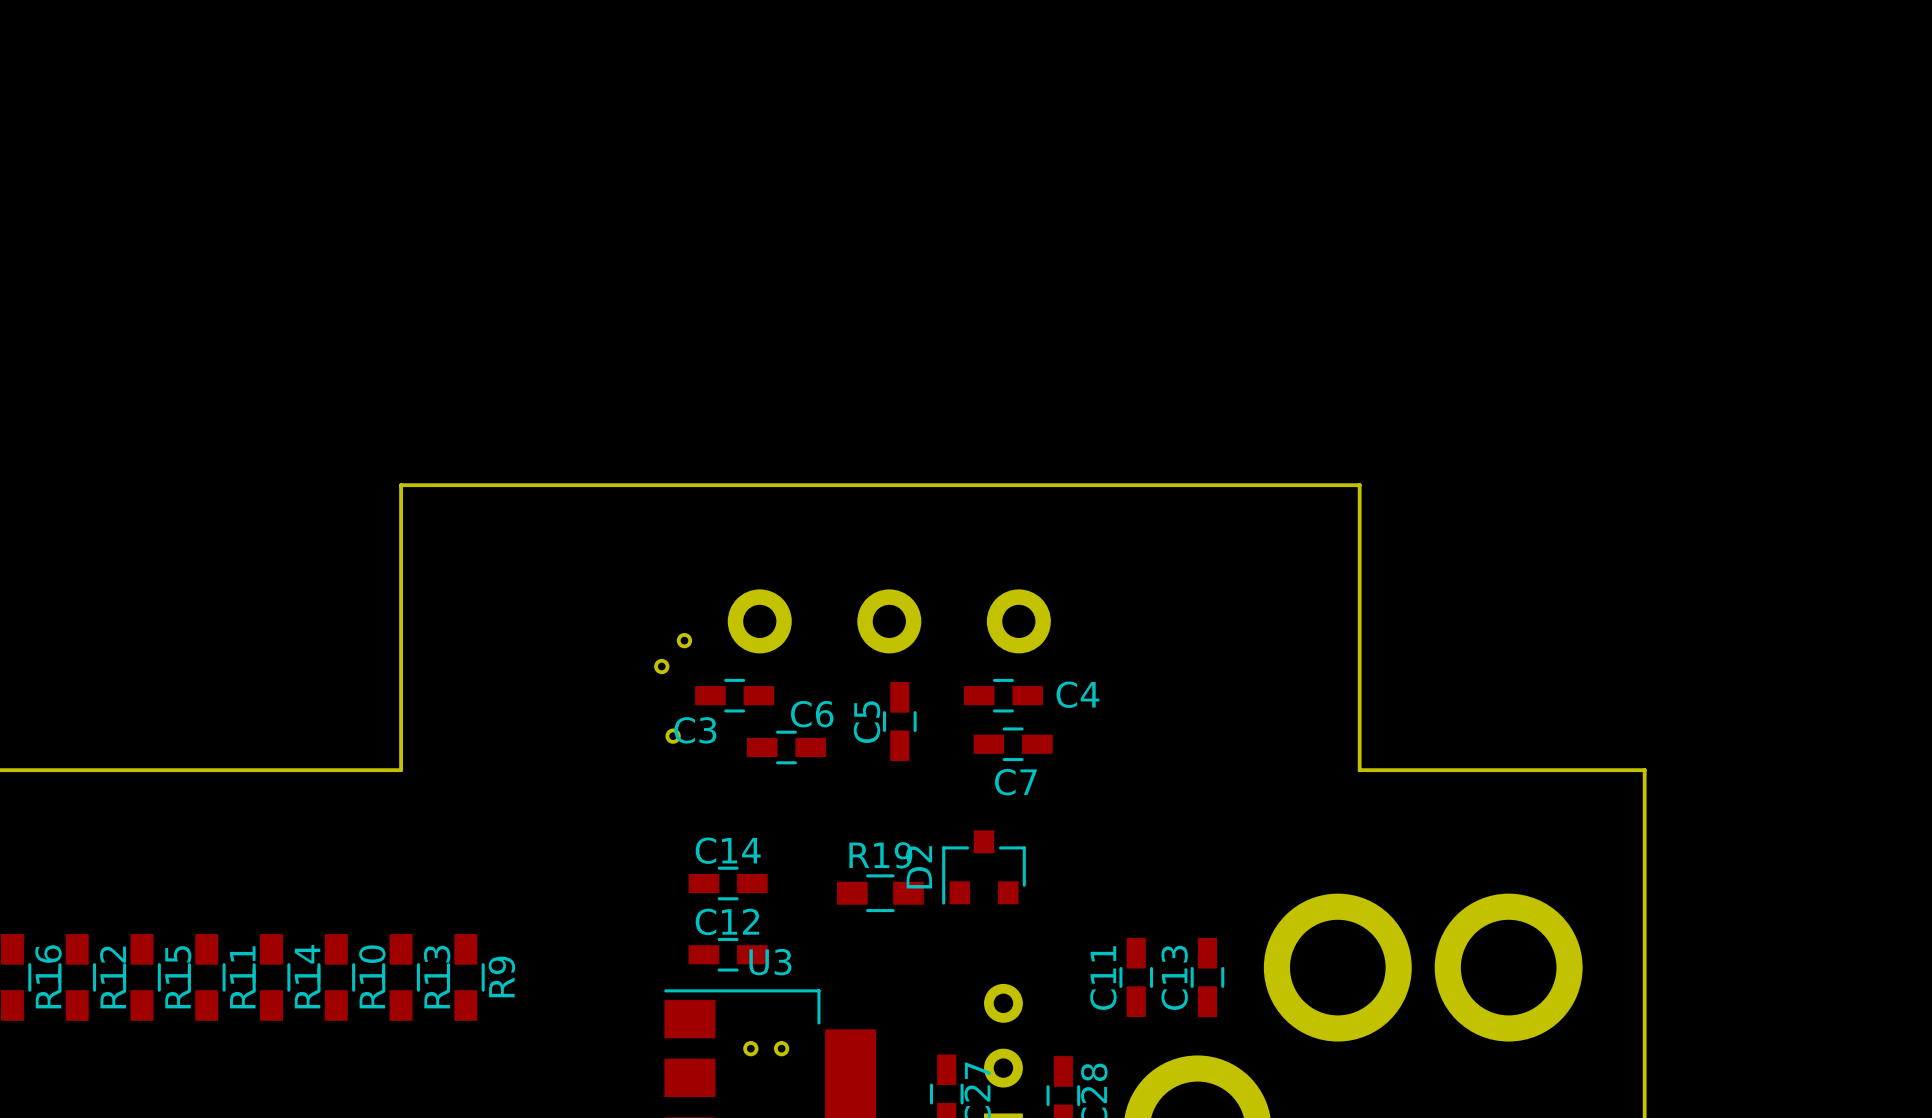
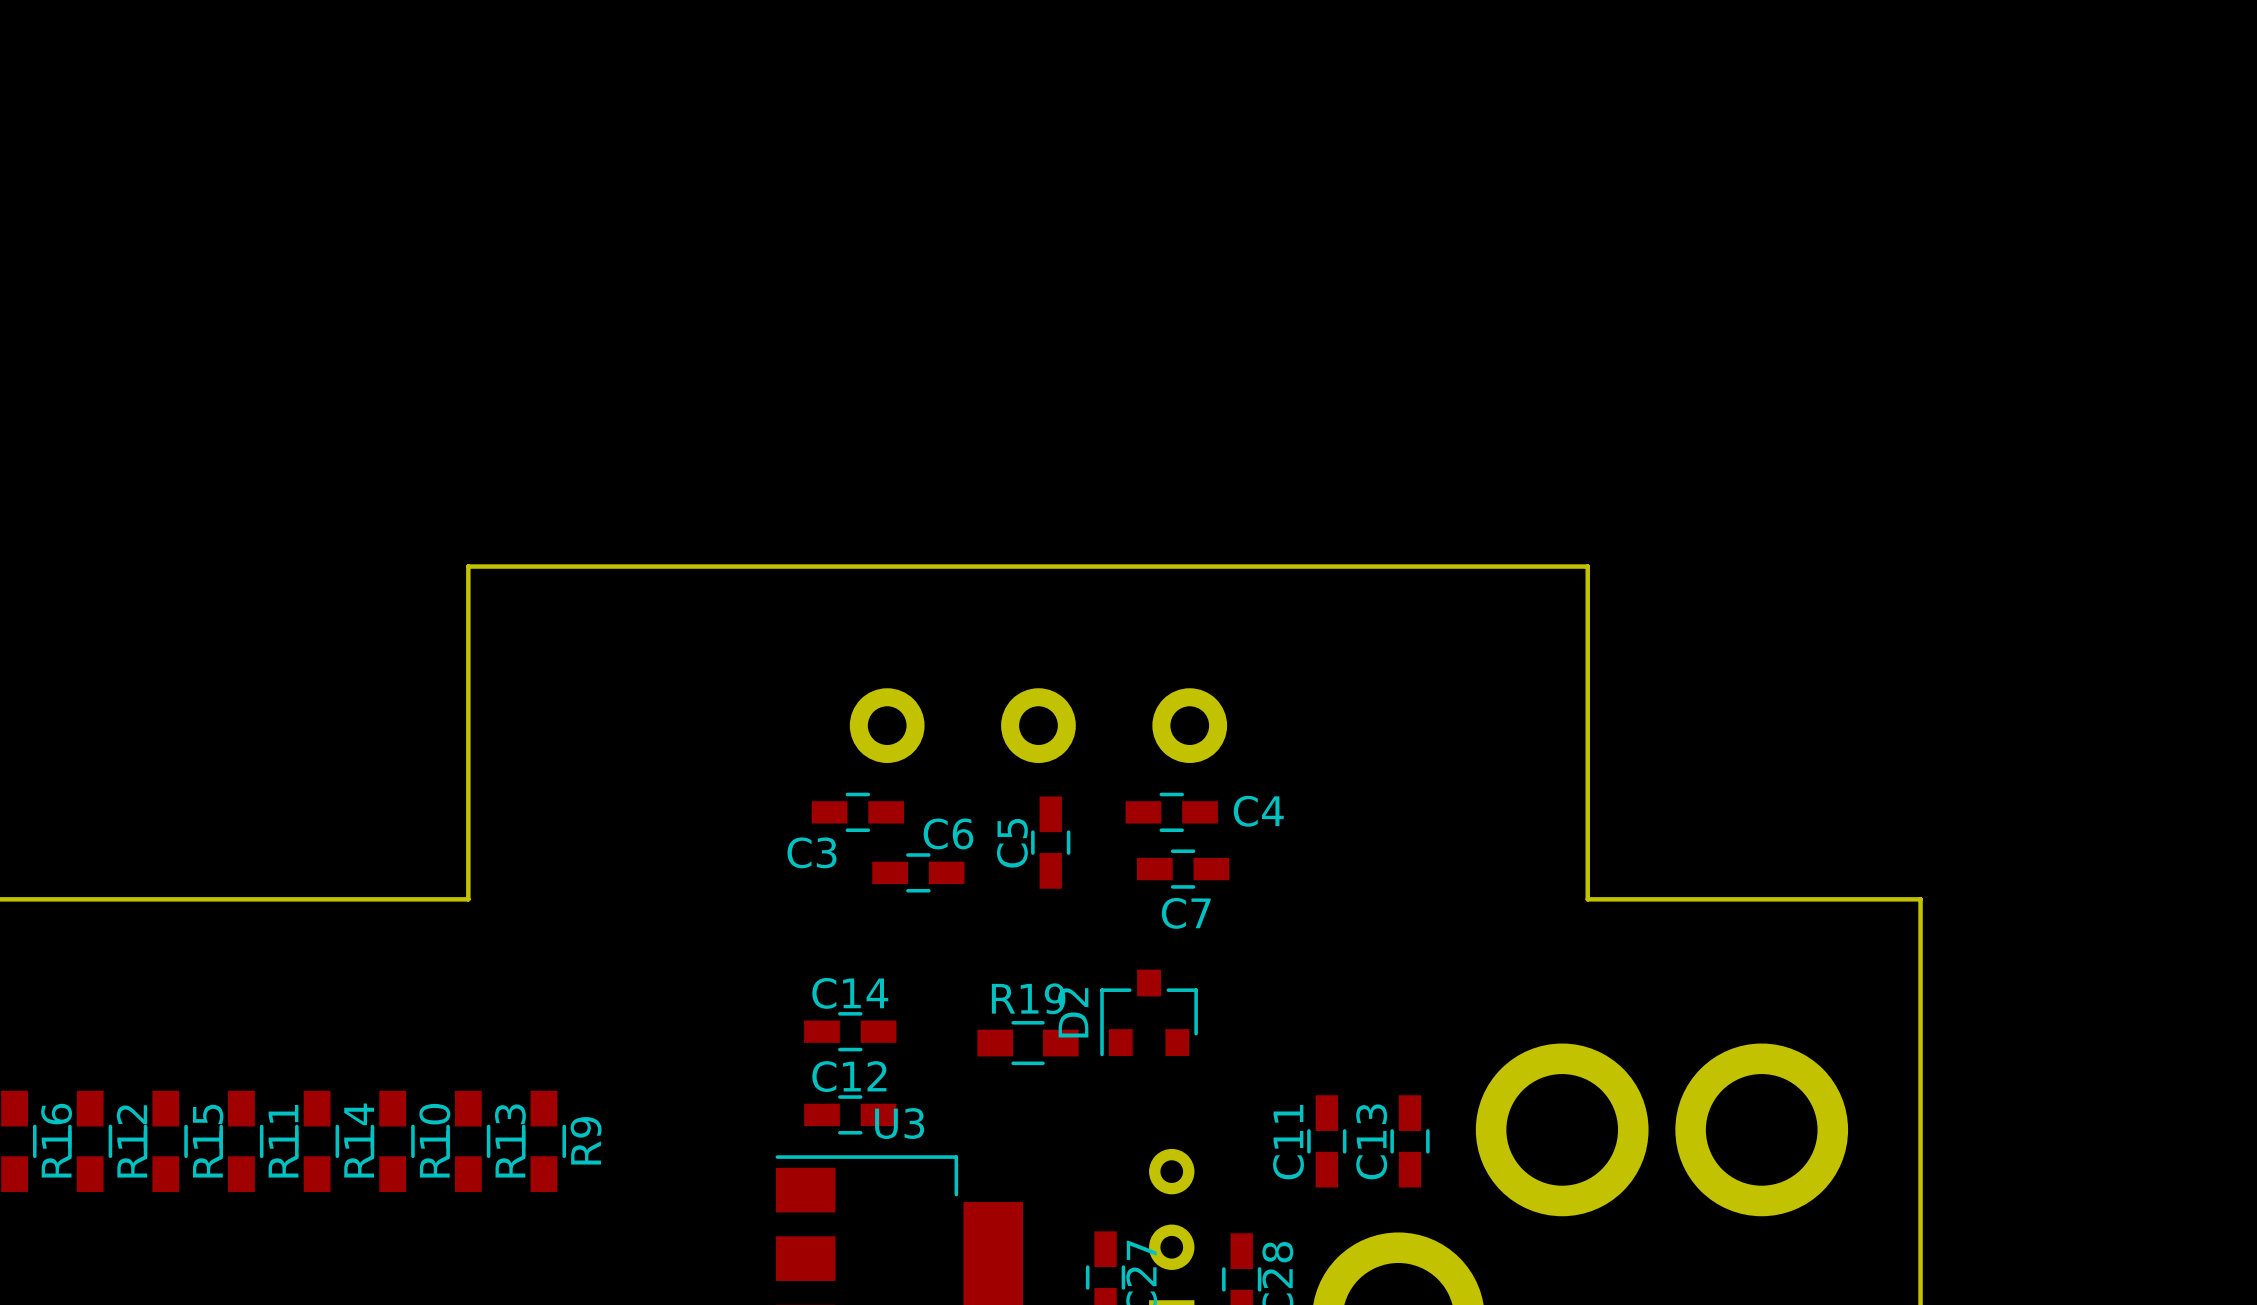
part: (684, 640) -> none
part: (661, 666) -> none
part: (673, 736) -> none
part: (750, 1048) -> none
part: (781, 1048) -> none

